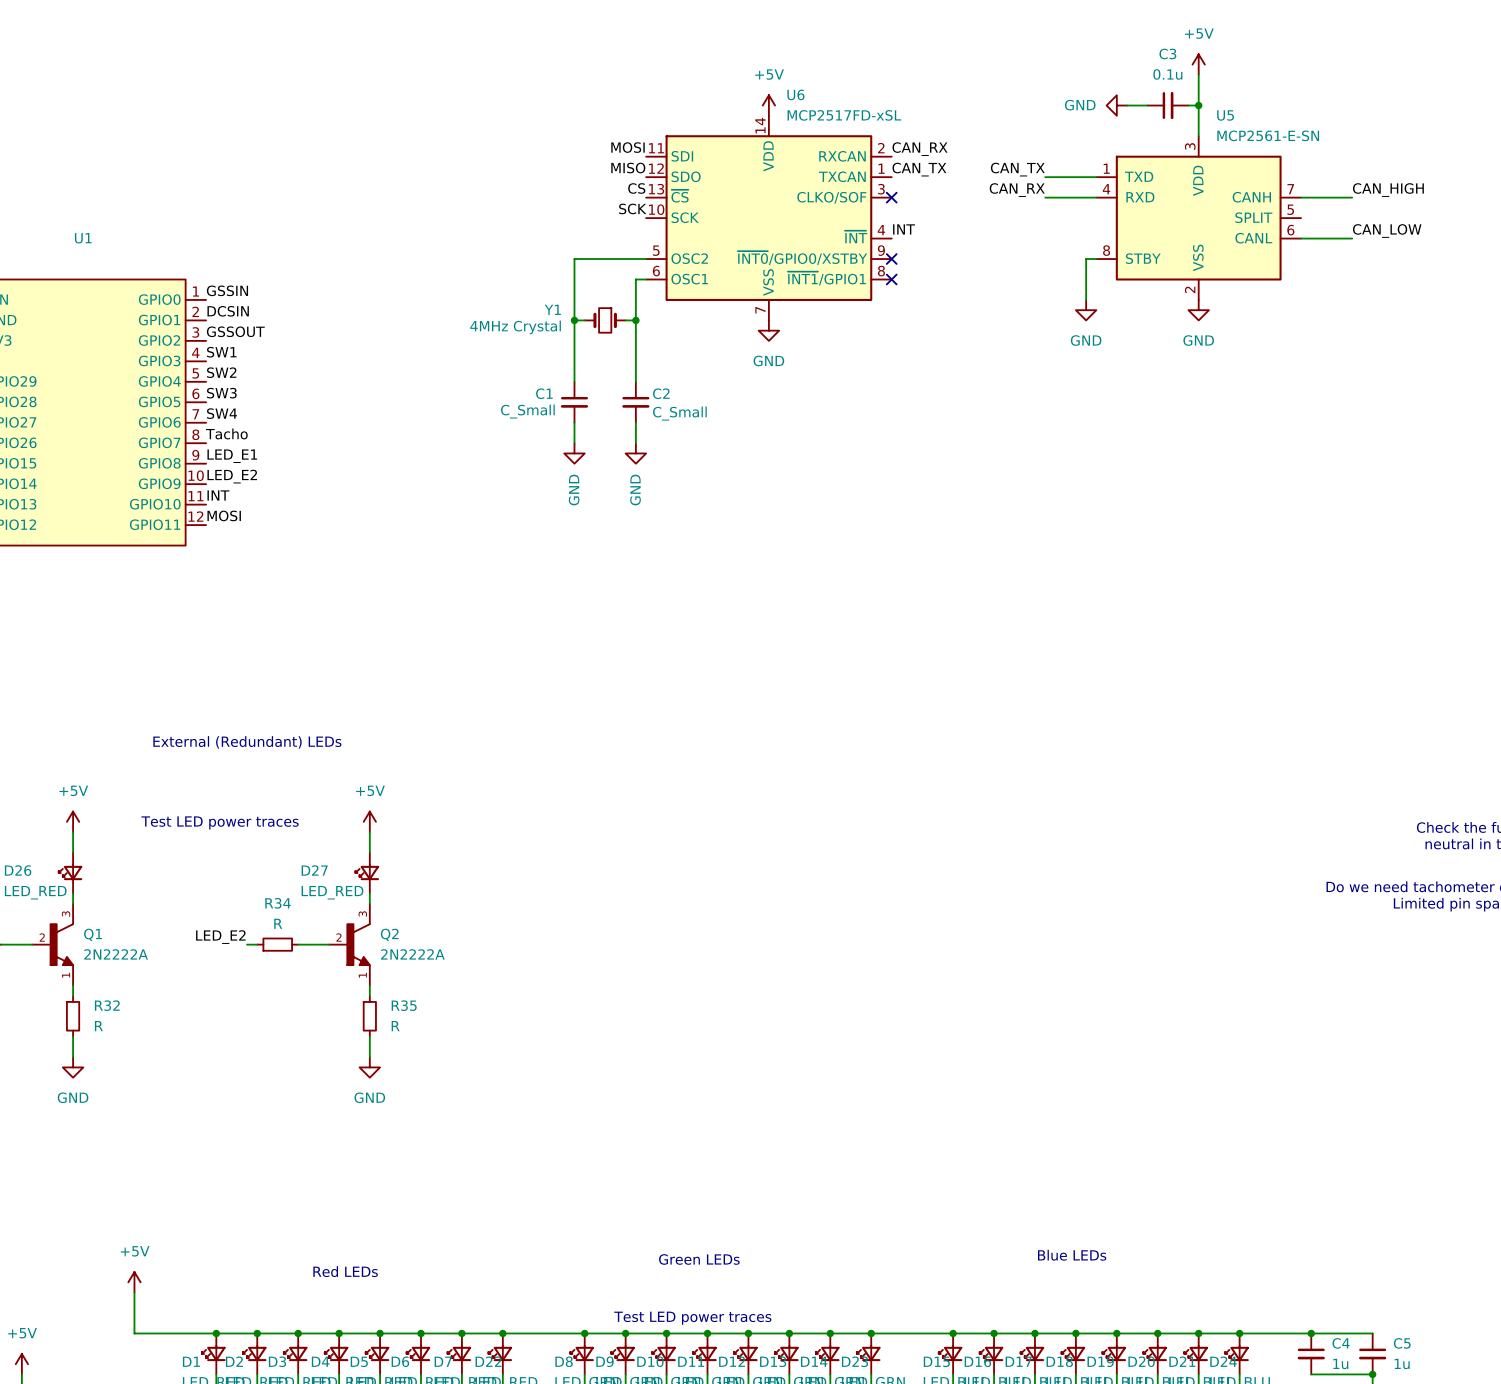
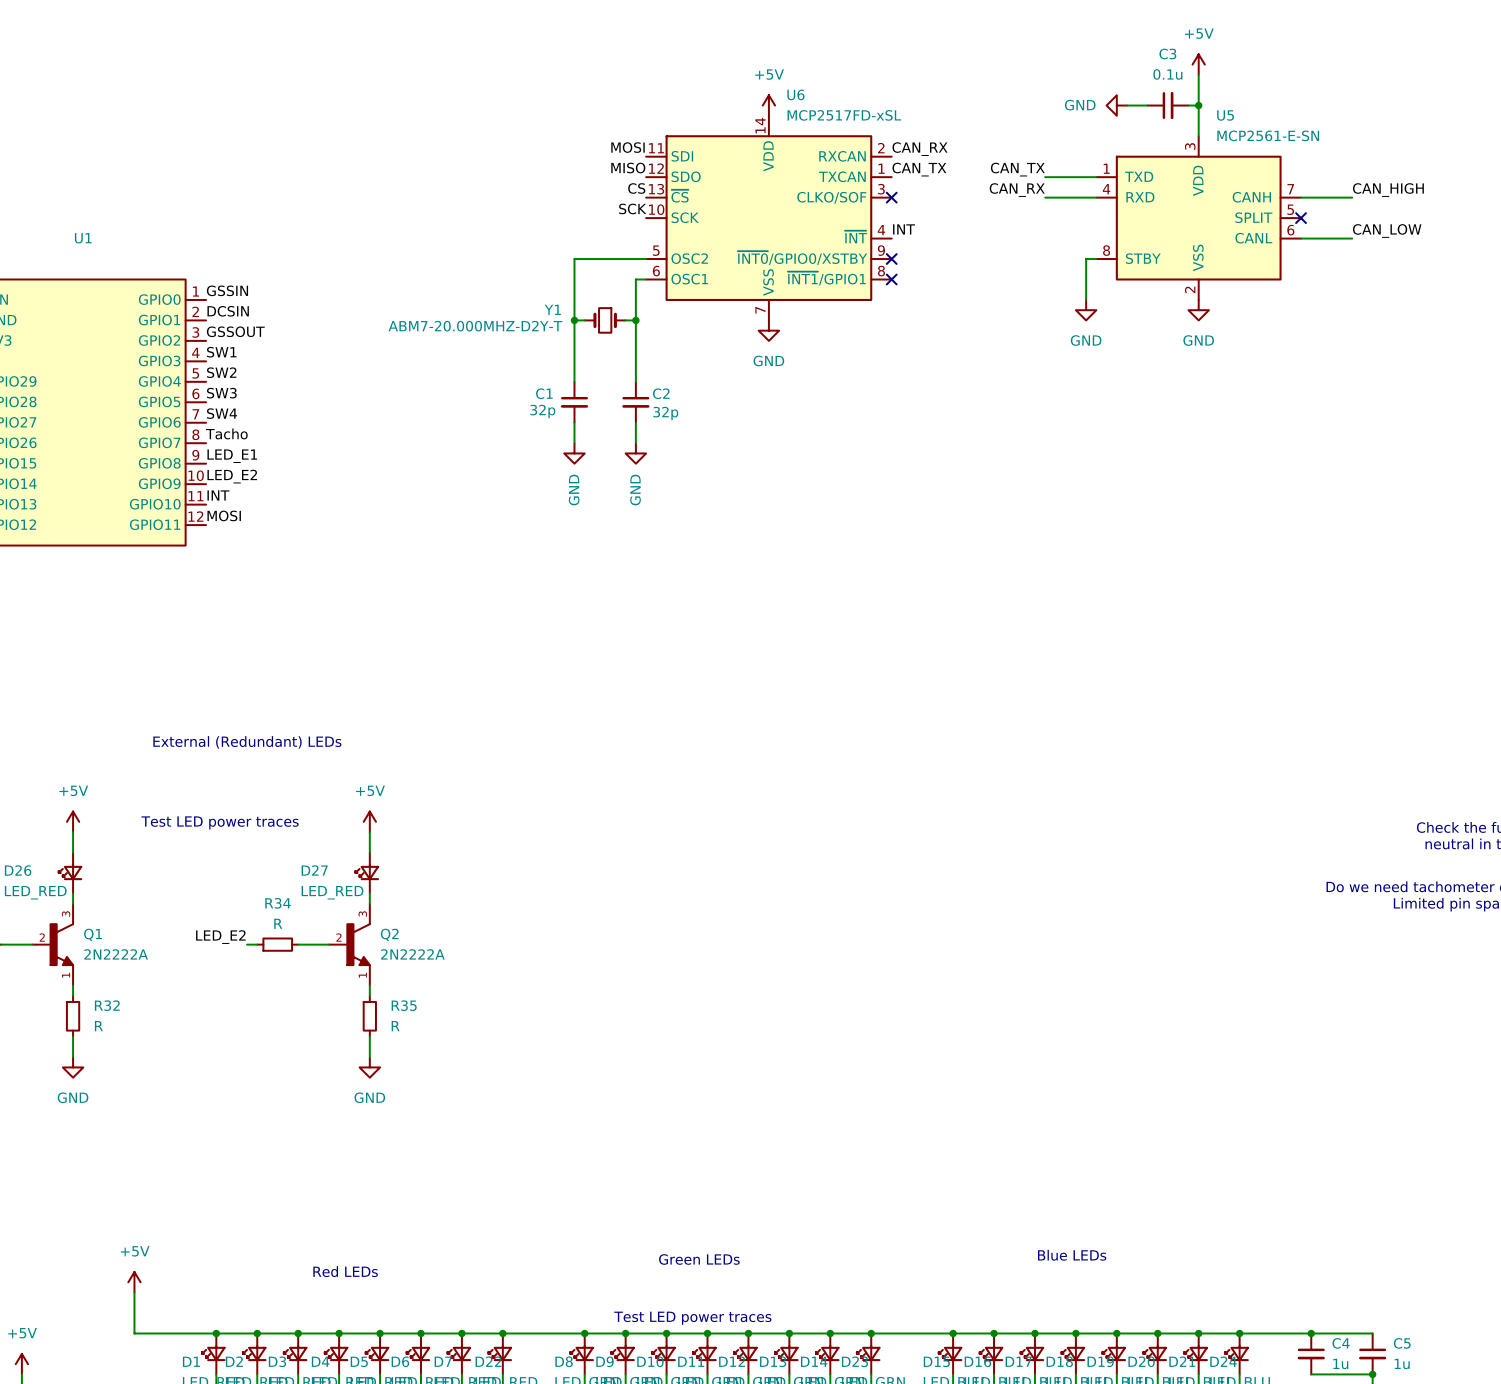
no-connect mark: none -> (1301, 218)
Y1 value: 4MHz Crystal (515, 327) -> ABM7-20.000MHZ-D2Y-T (475, 326)
C1 value: C_Small (527, 411) -> 32p (542, 411)
C2 value: C_Small (679, 413) -> 32p (665, 413)

